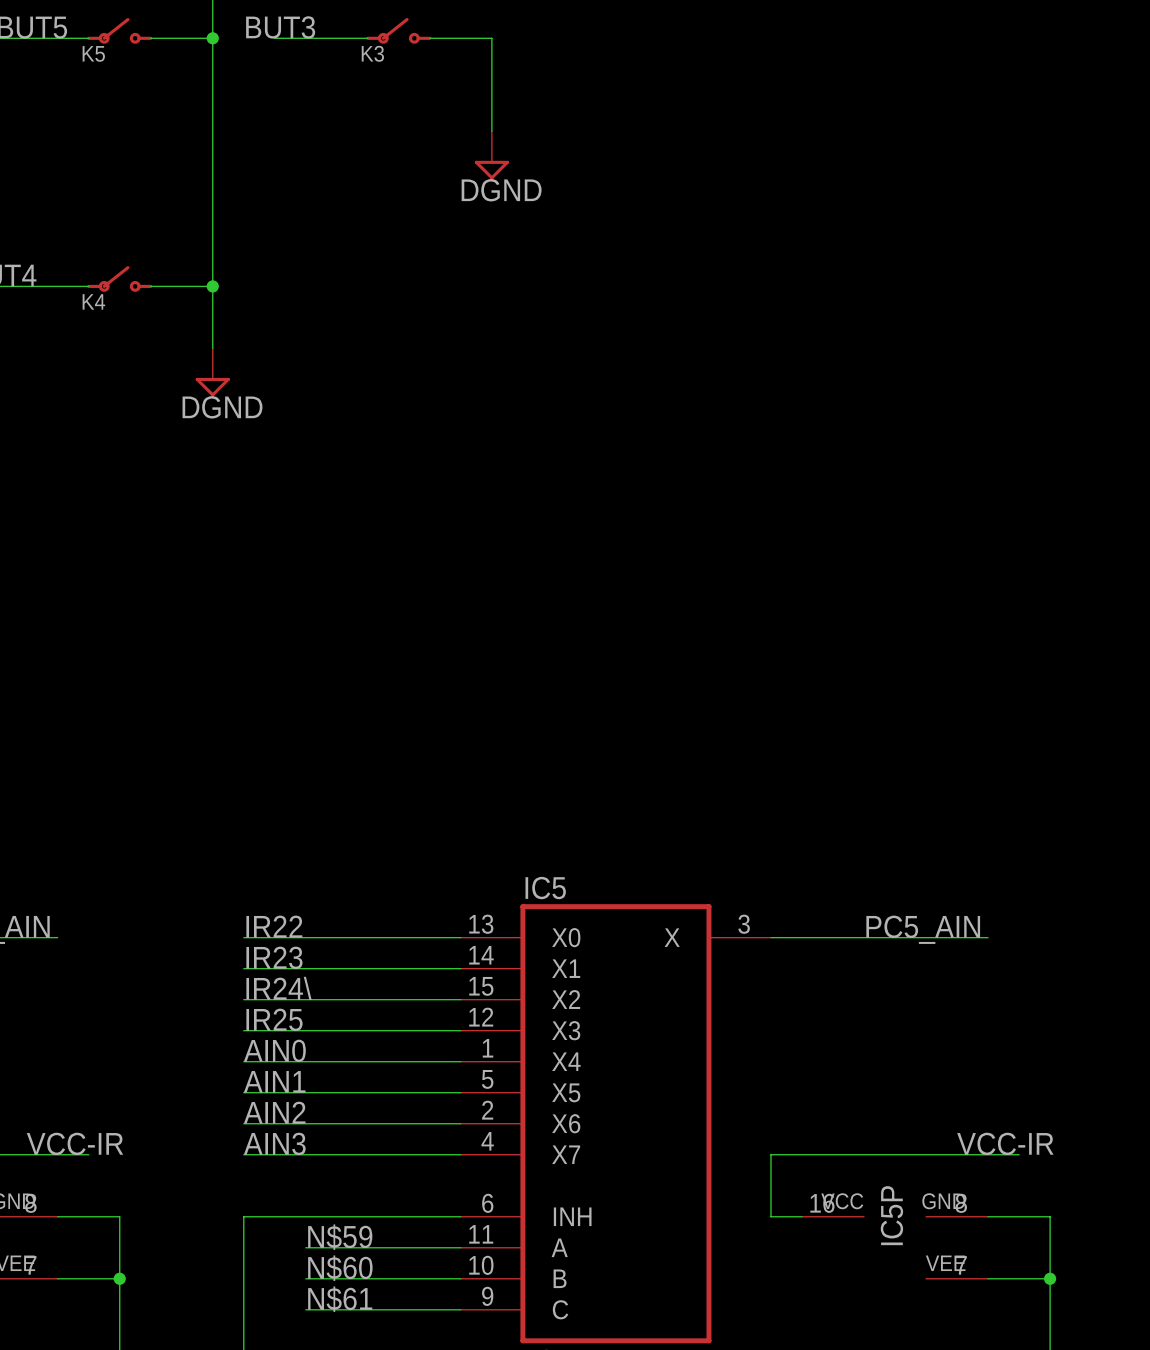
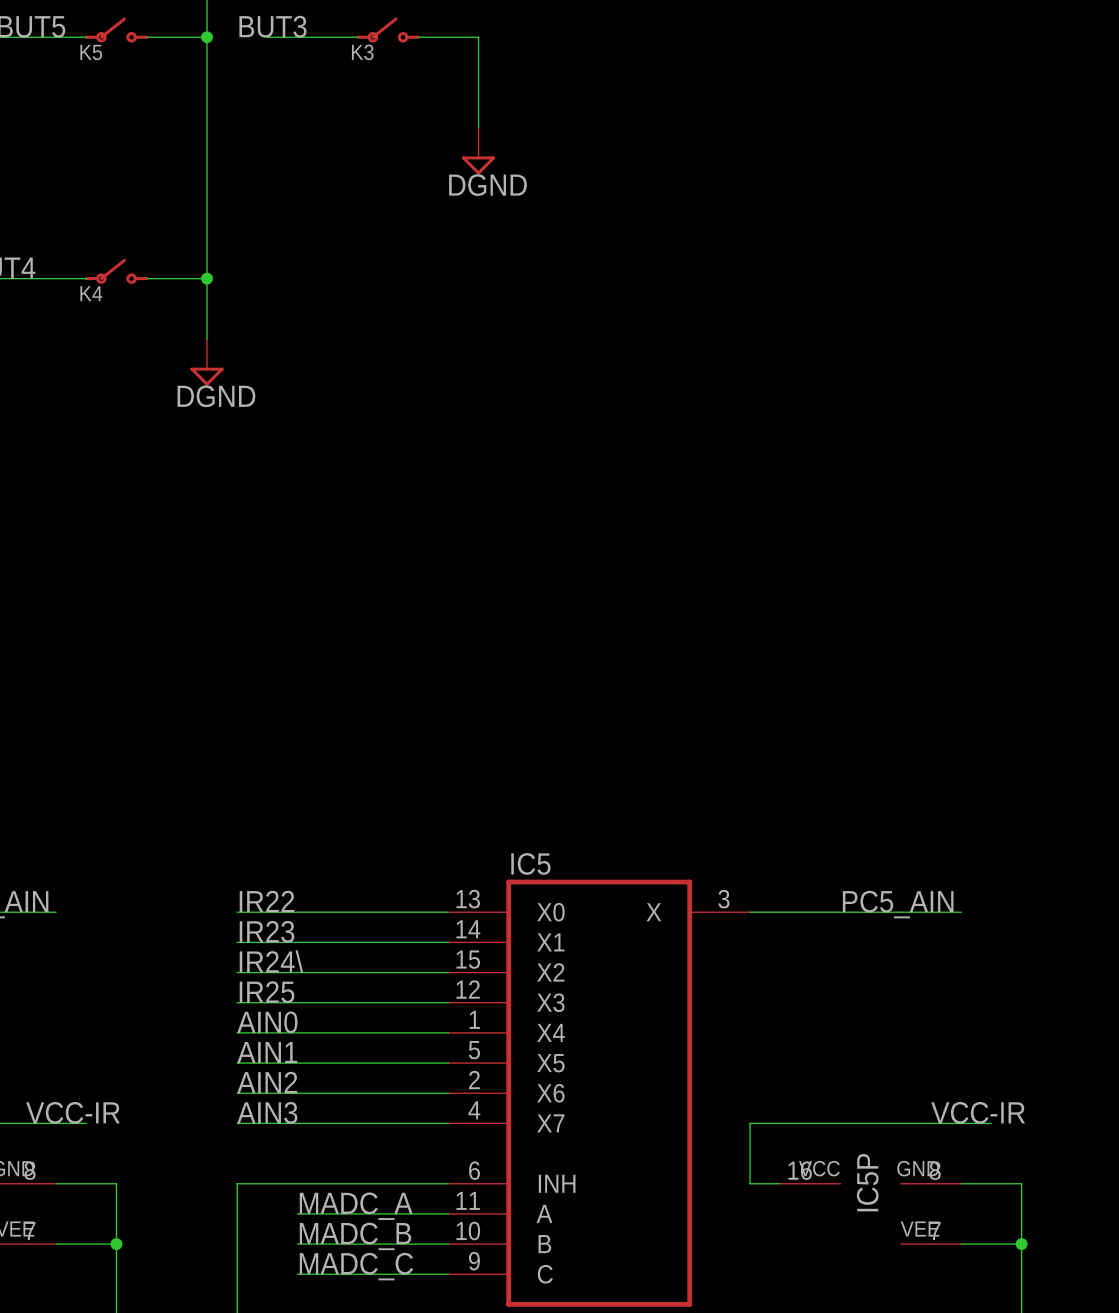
label: N$59 (340, 1237) -> MADC_A (356, 1206)
label: N$60 (340, 1268) -> MADC_B (355, 1236)
label: N$61 (340, 1299) -> MADC_C (356, 1266)

